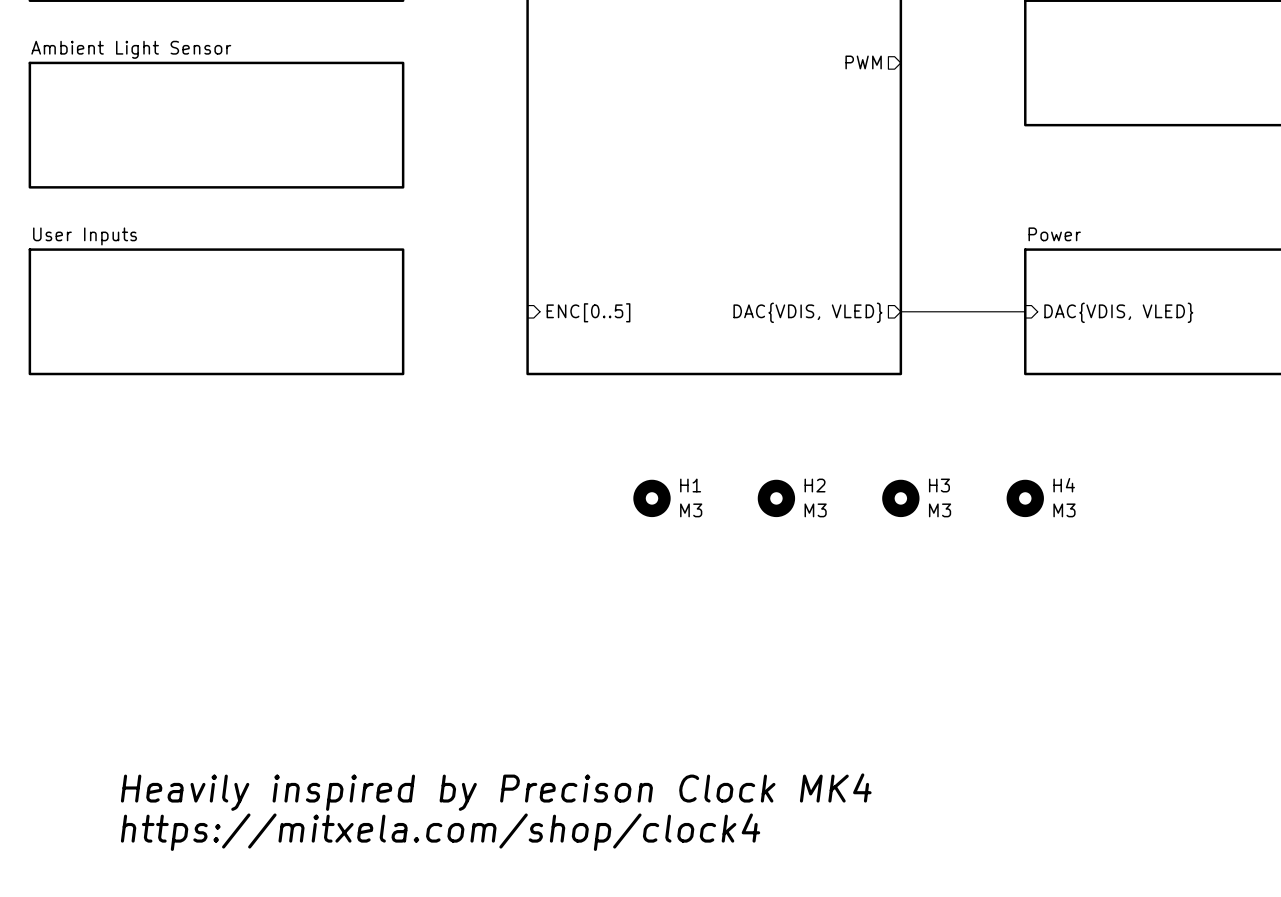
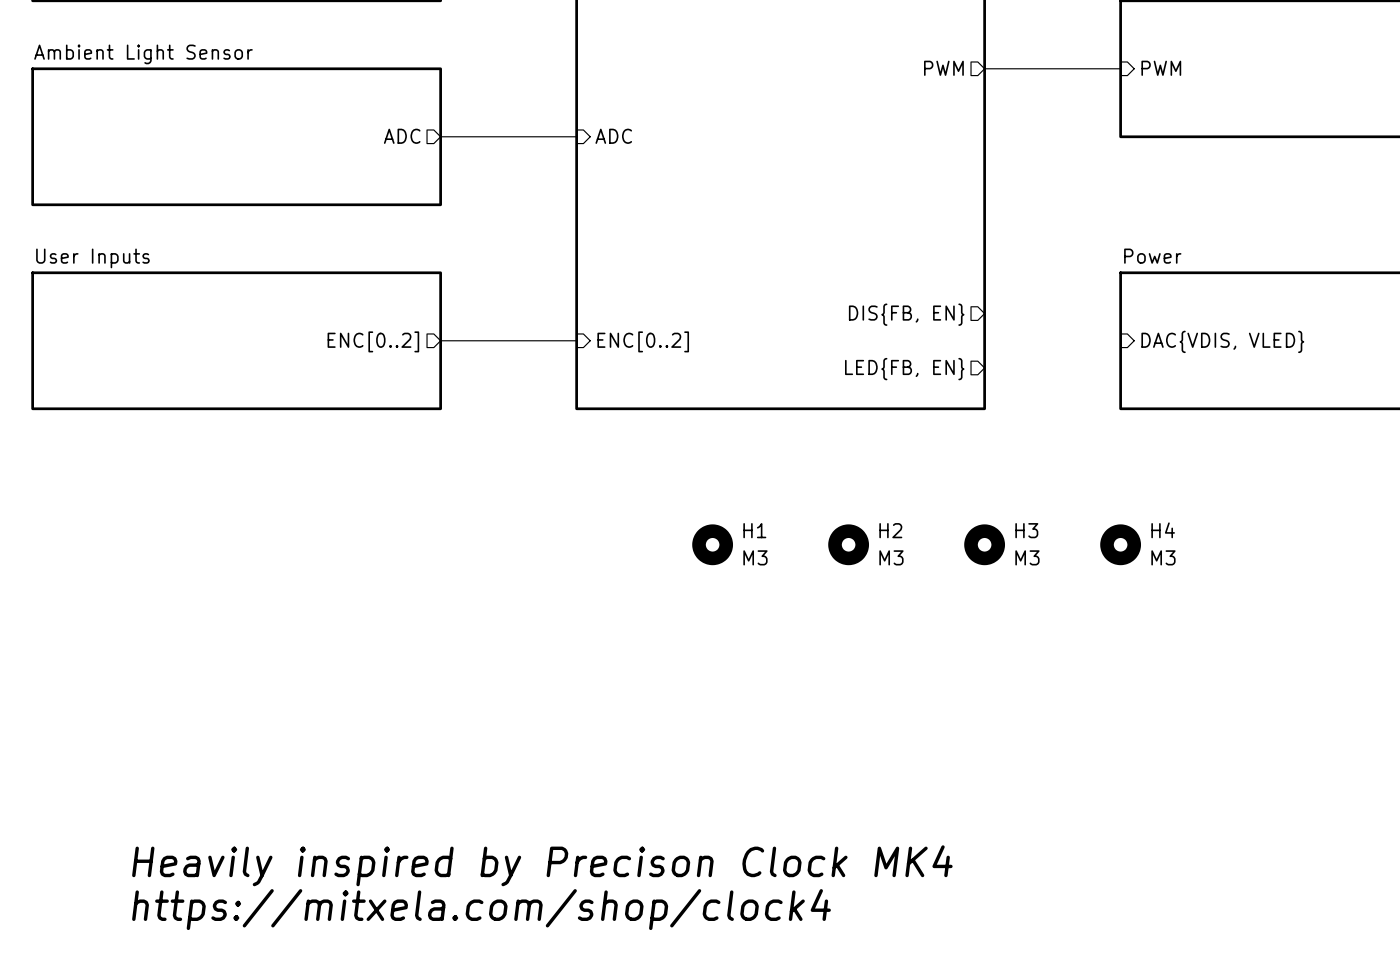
wire: none -> (984, 68) (1120, 68)
sheet pin: none -> PWM (1161, 68)
sheet pin: none -> ADC (402, 136)
sheet pin: none -> ADC (613, 136)
wire: none -> (440, 136) (576, 136)
sheet pin: none -> DIS{FB, EN} (906, 314)
bus: none -> (440, 340) (576, 340)
bus: (900, 311) (1025, 311) -> none
sheet pin: none -> ENC[0..2] (373, 341)
sheet pin: ENC[0..5] (588, 312) -> ENC[0..2] (643, 341)
sheet pin: DAC{VDIS, VLED} (807, 312) -> none
sheet pin: none -> LED{FB, EN} (904, 369)

